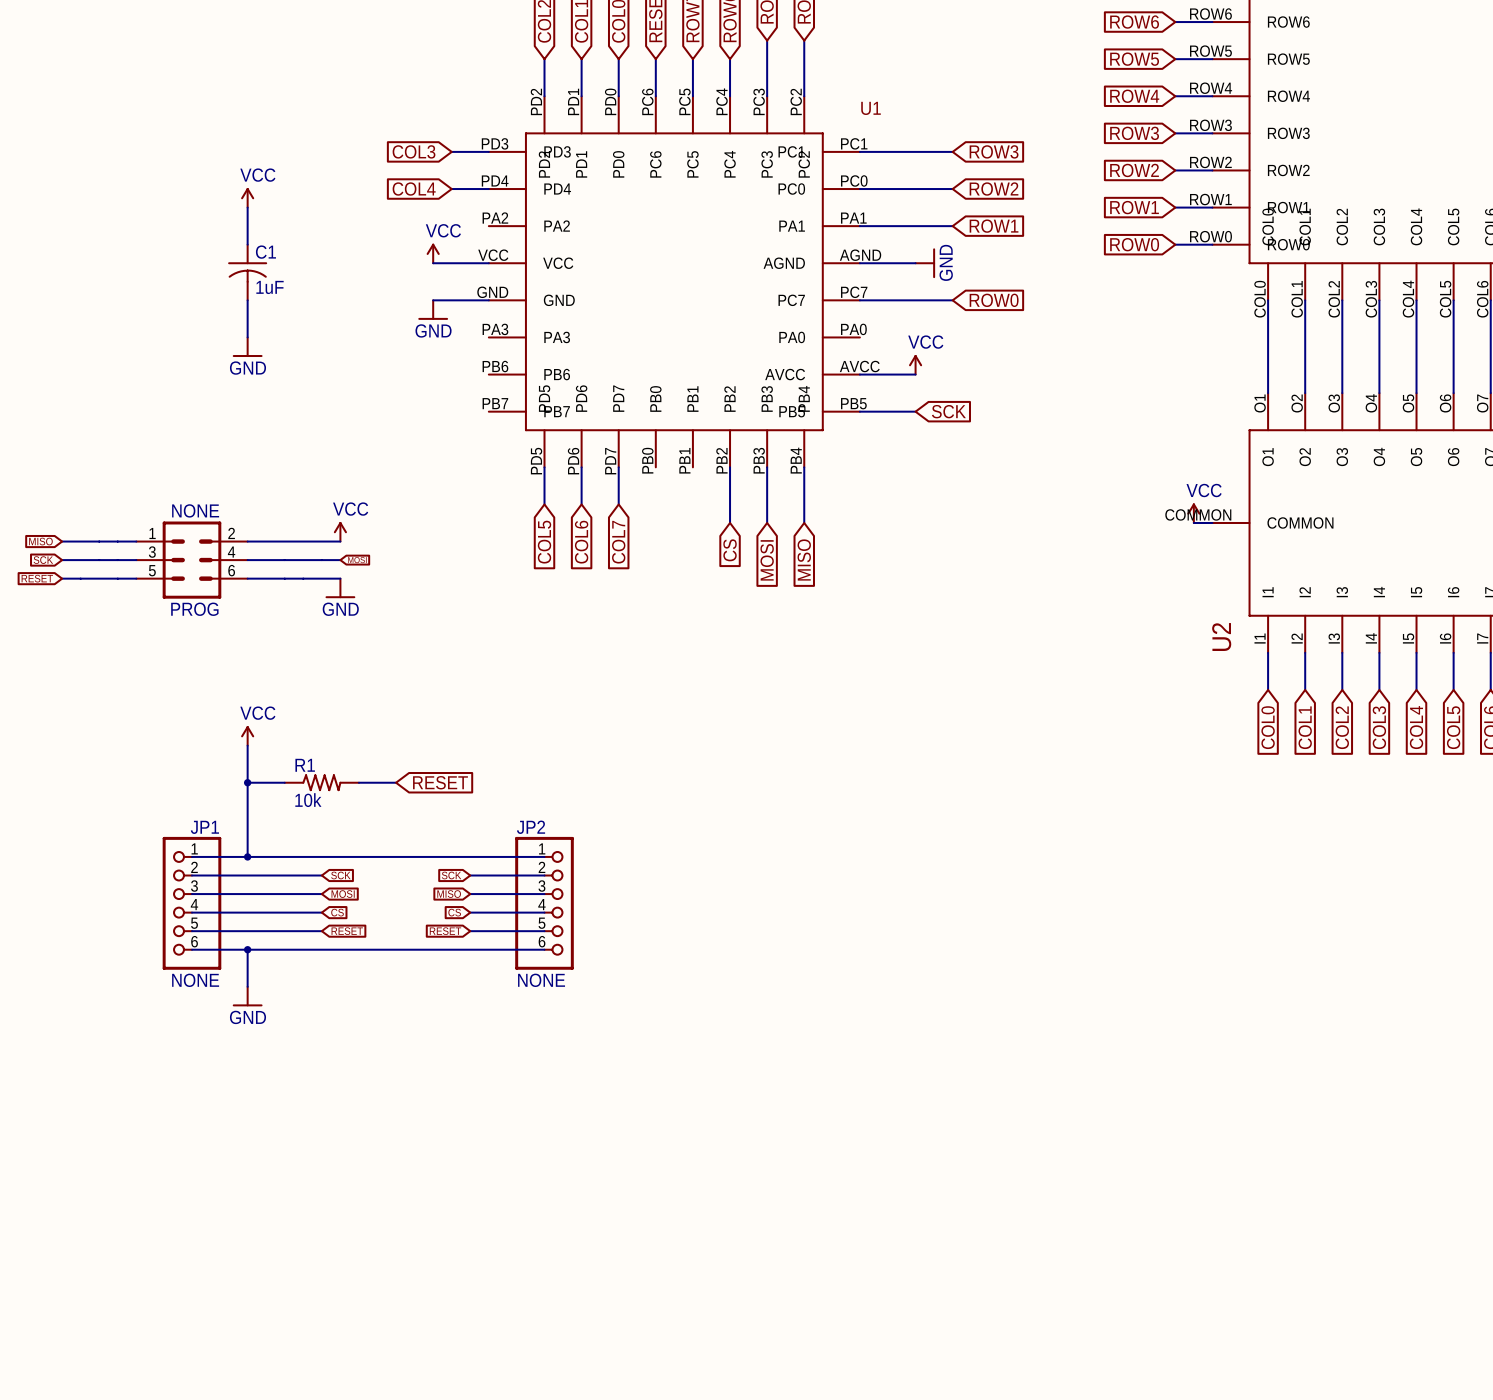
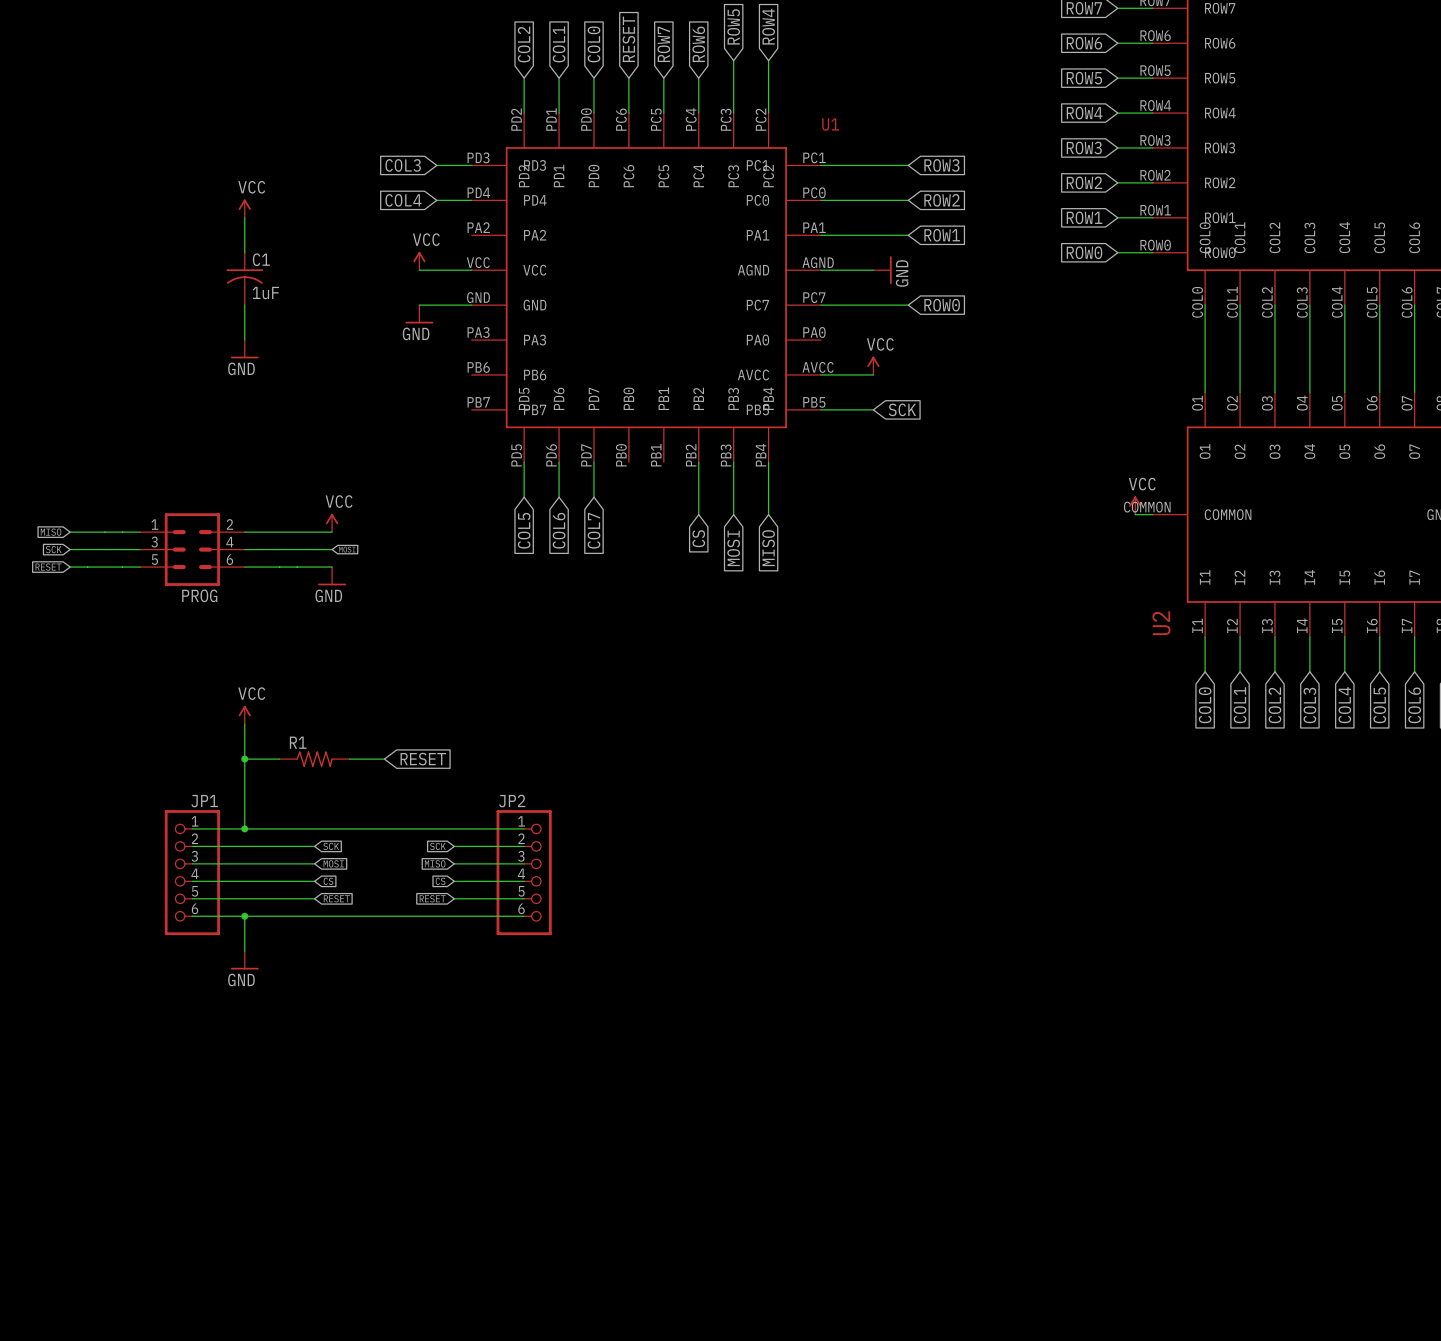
PROG value: NONE (195, 510) -> none
R1 value: 10k (308, 800) -> none
JP1 value: NONE (195, 980) -> none
JP2 value: NONE (541, 980) -> none

